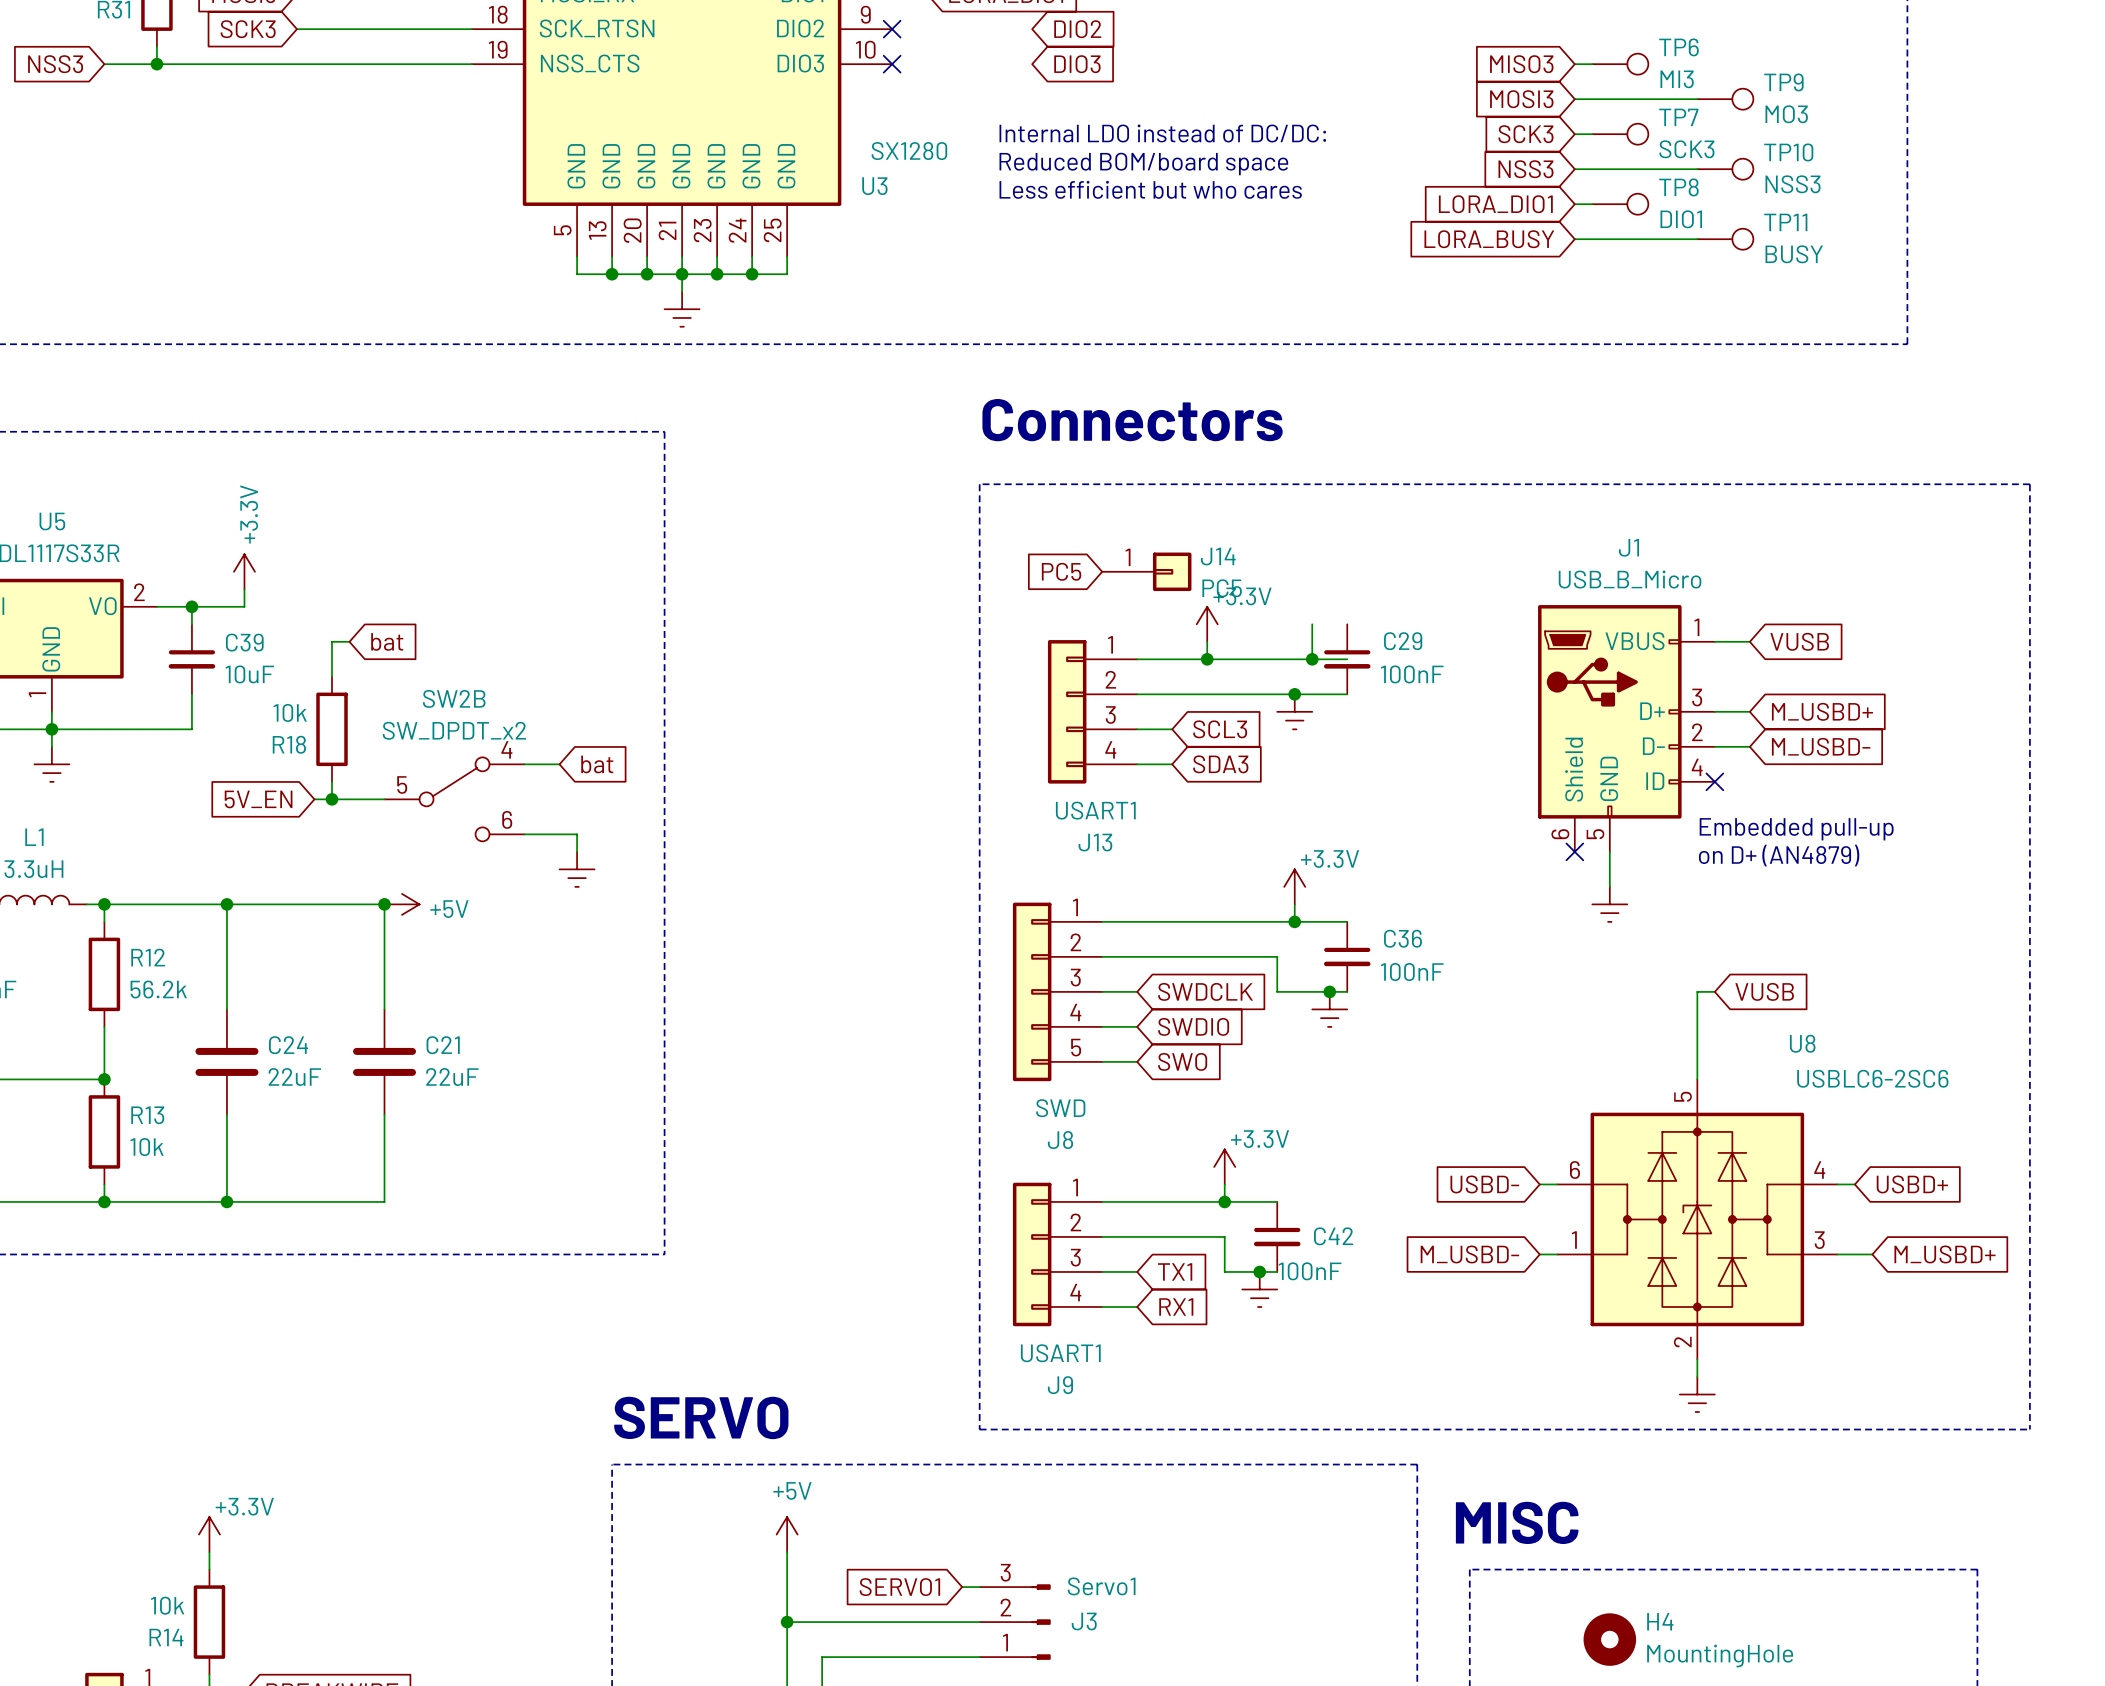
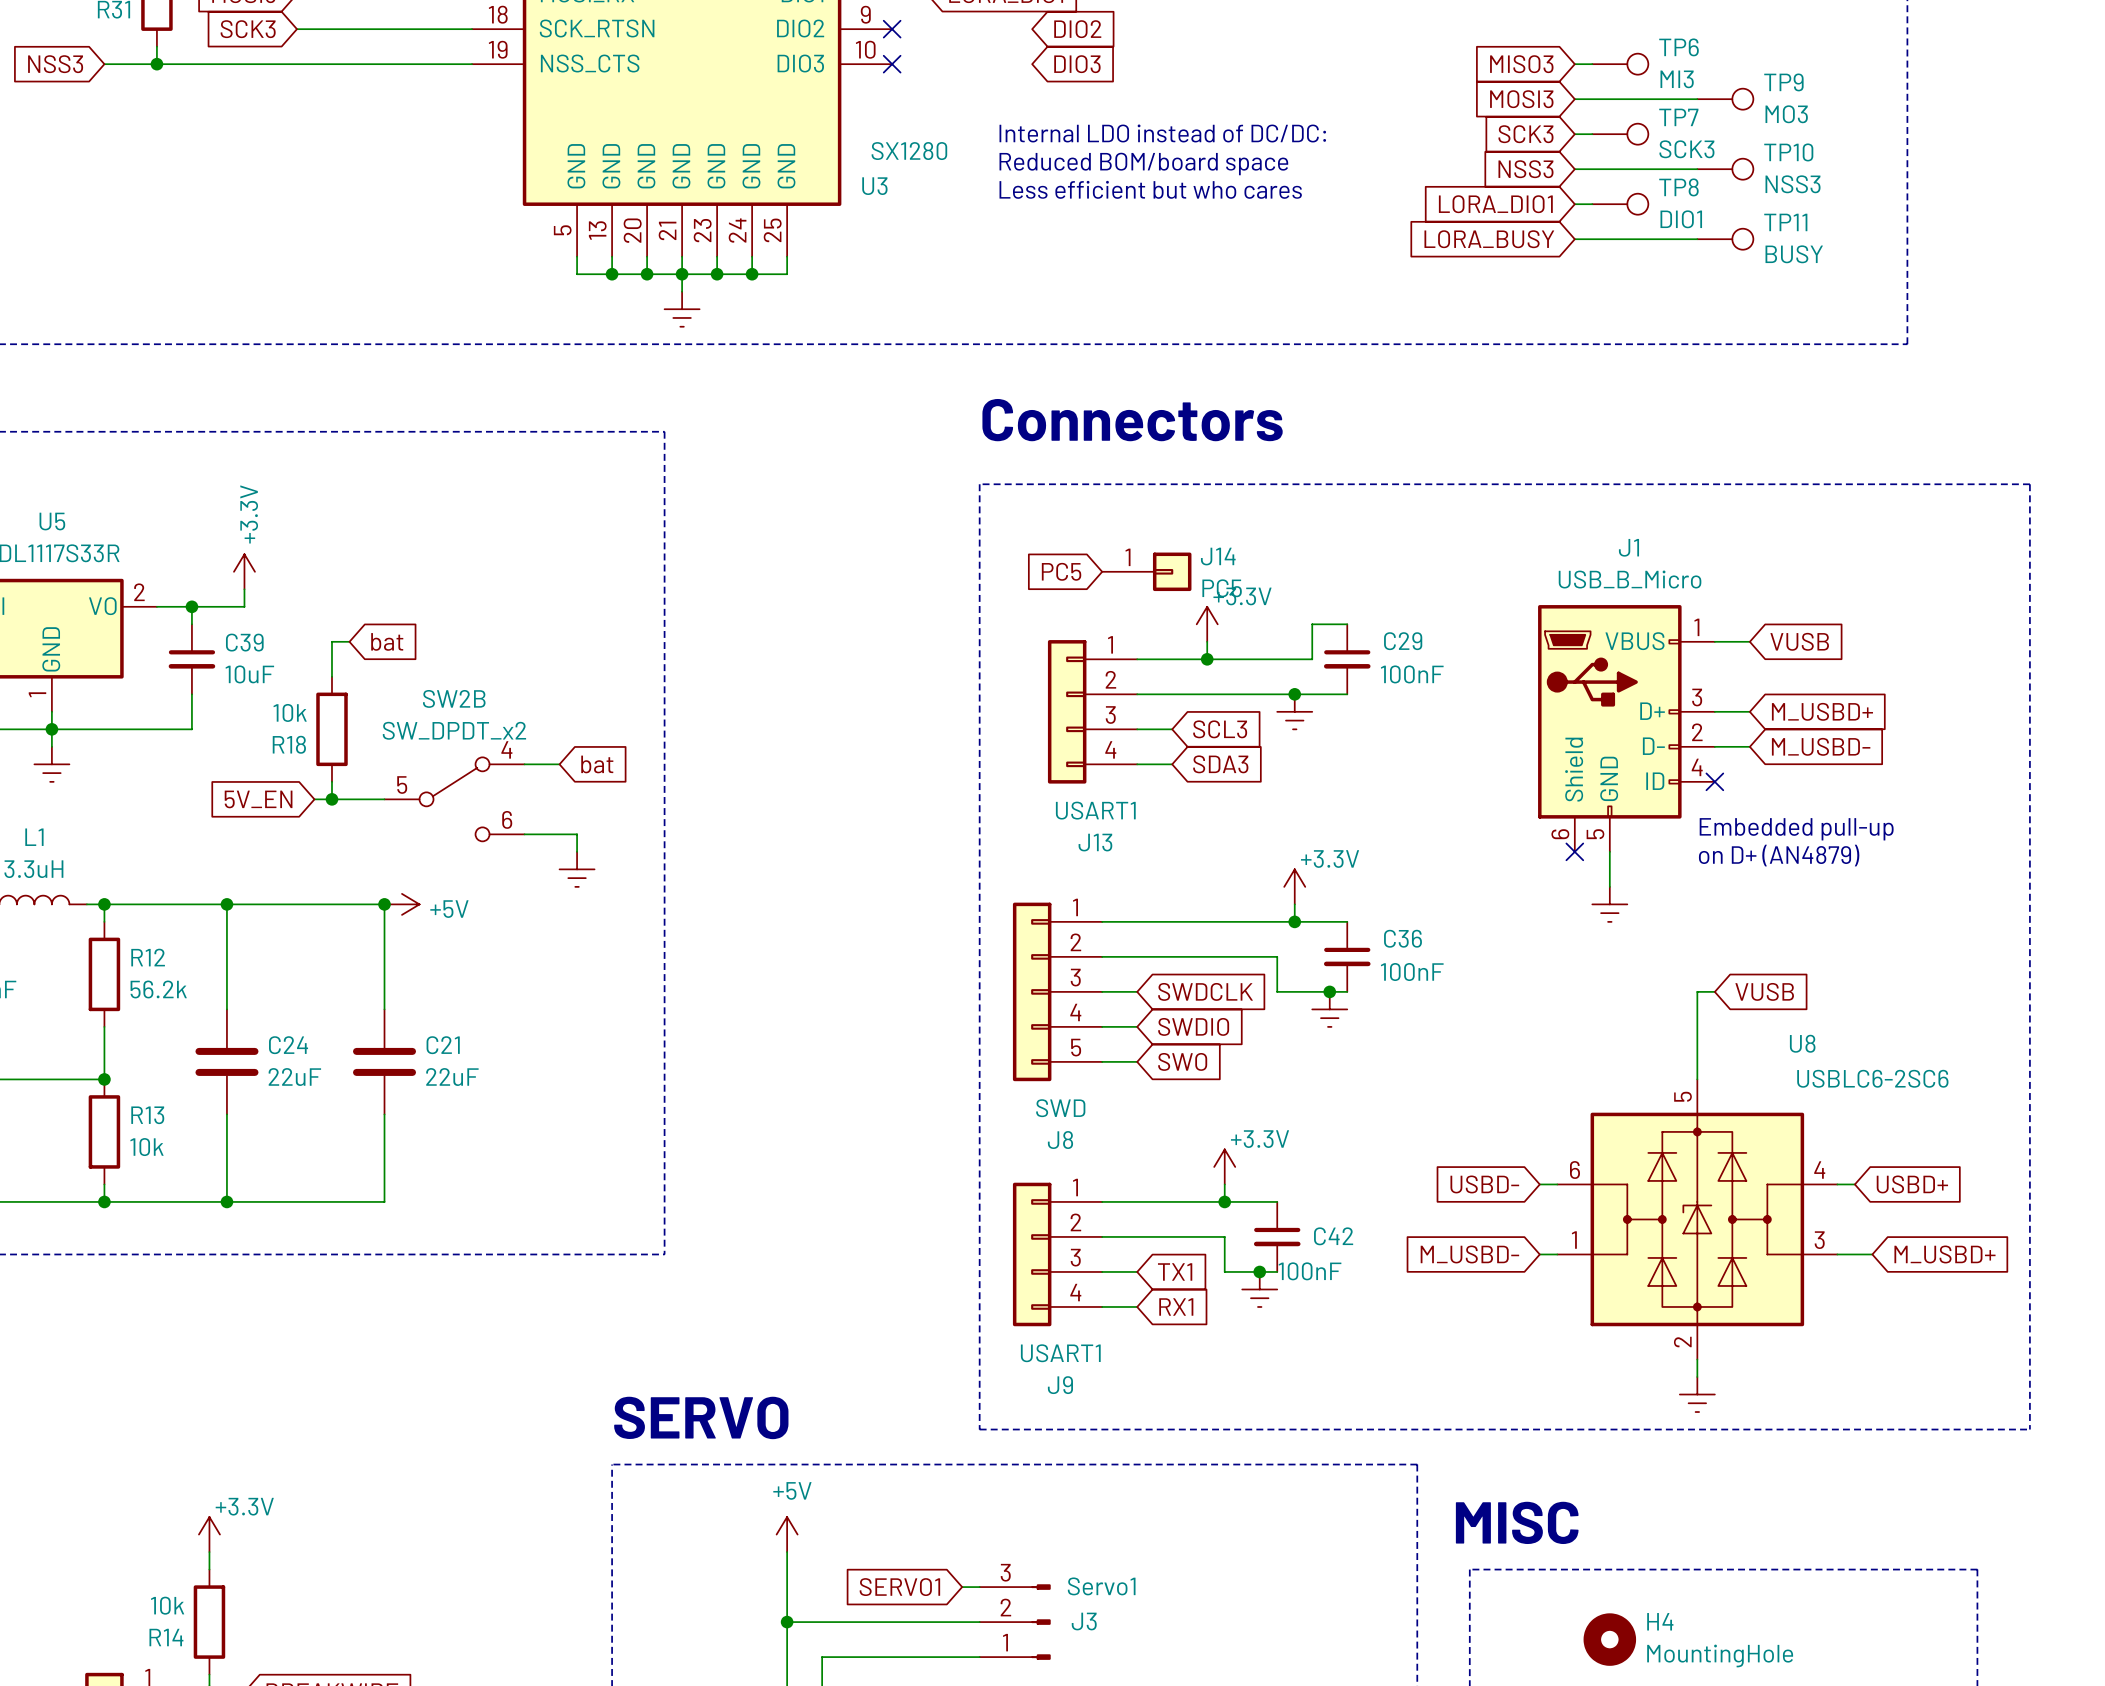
wire: (1312, 659) (1347, 659) -> (1312, 624) (1347, 624)
junction: (1312, 659) -> none

